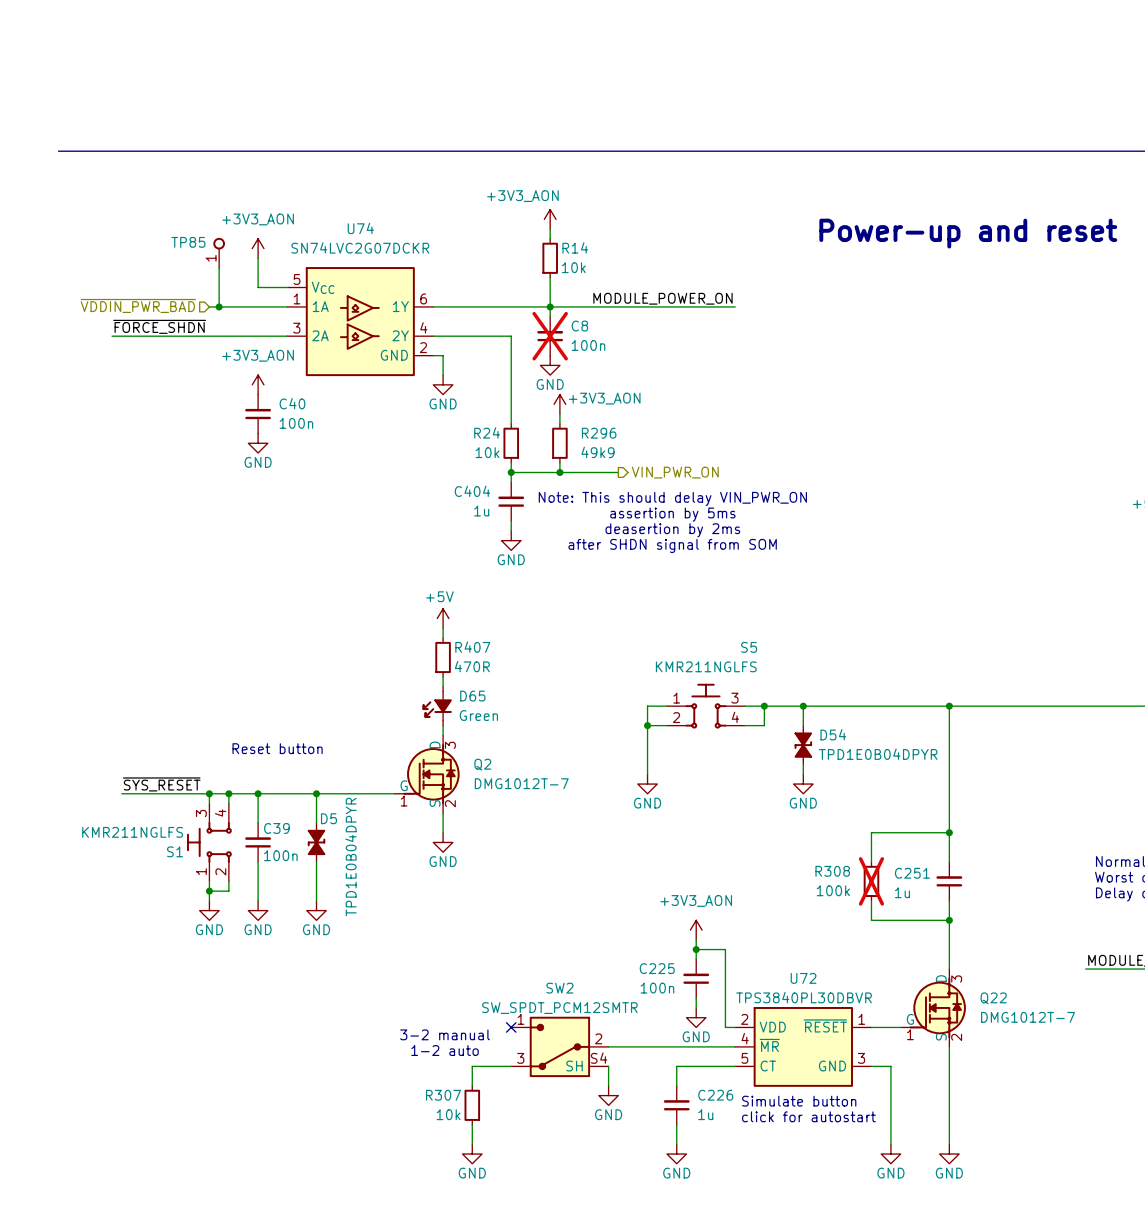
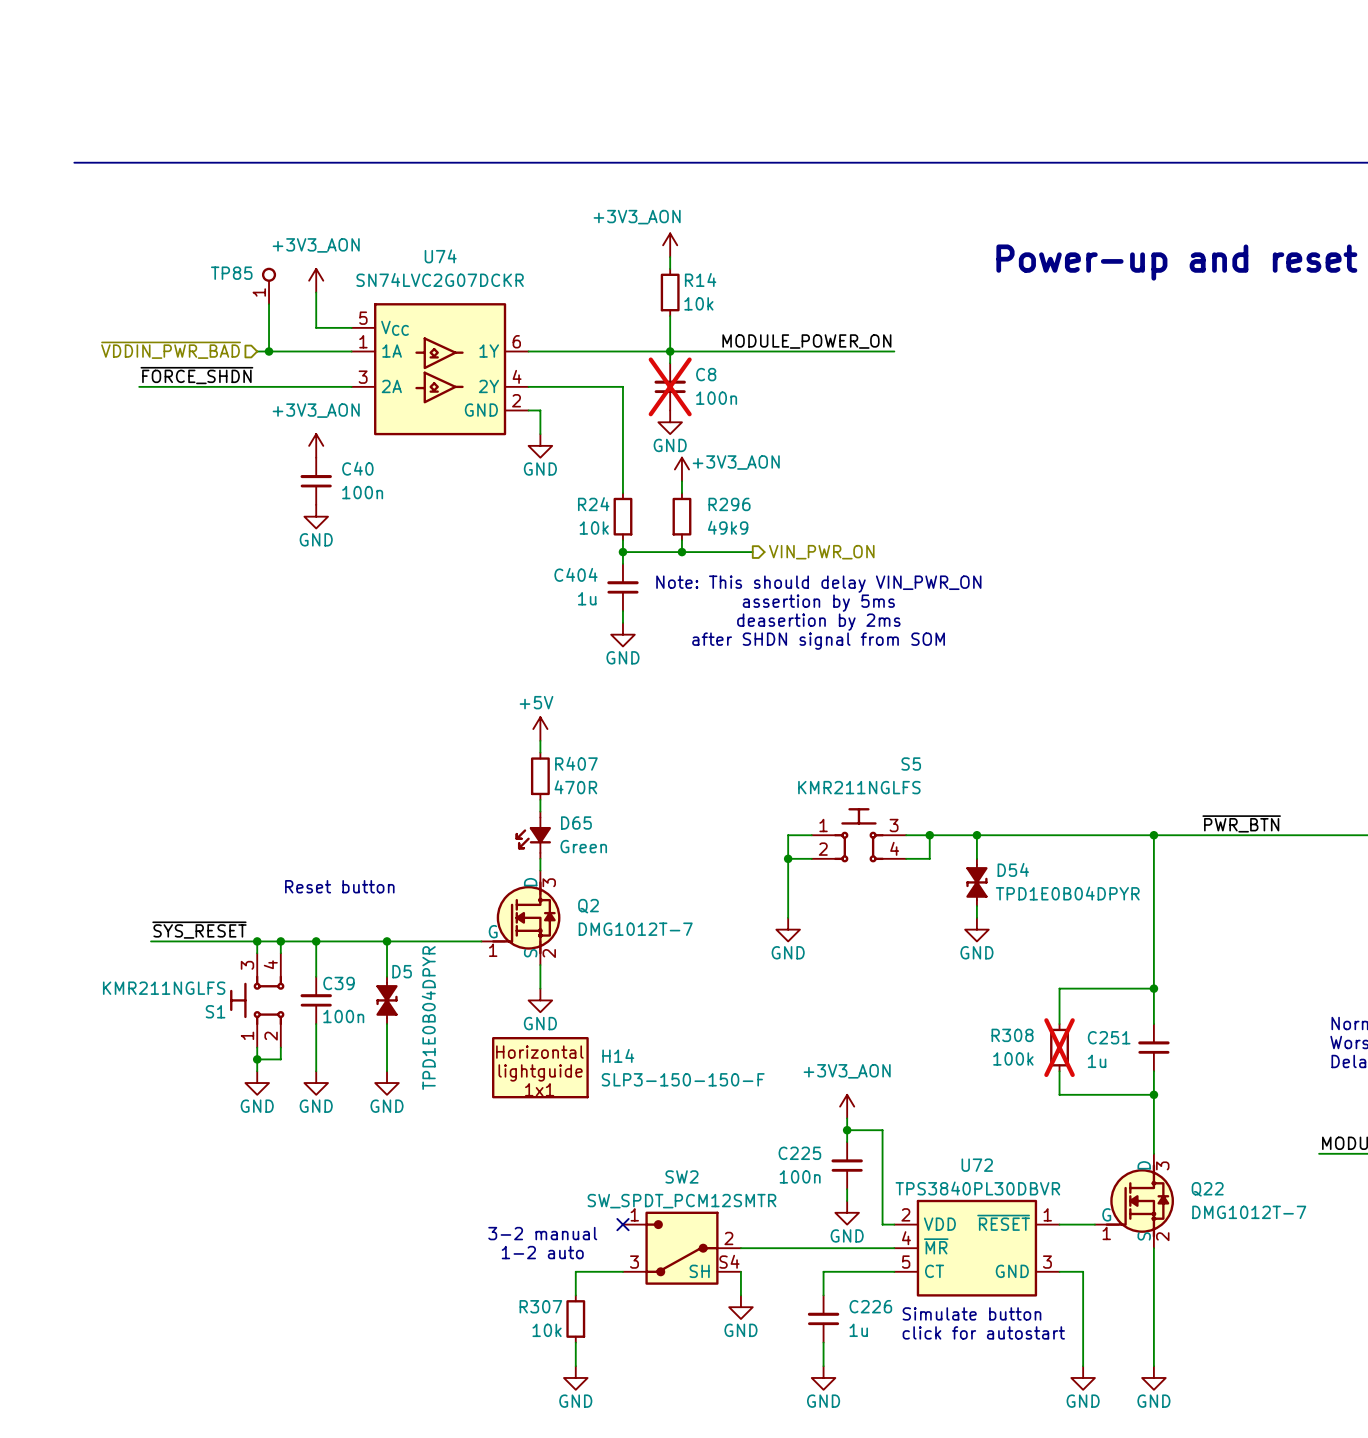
label: none -> ~{PWR_BTN} (1241, 823)
H14: none -> (540, 1067)

